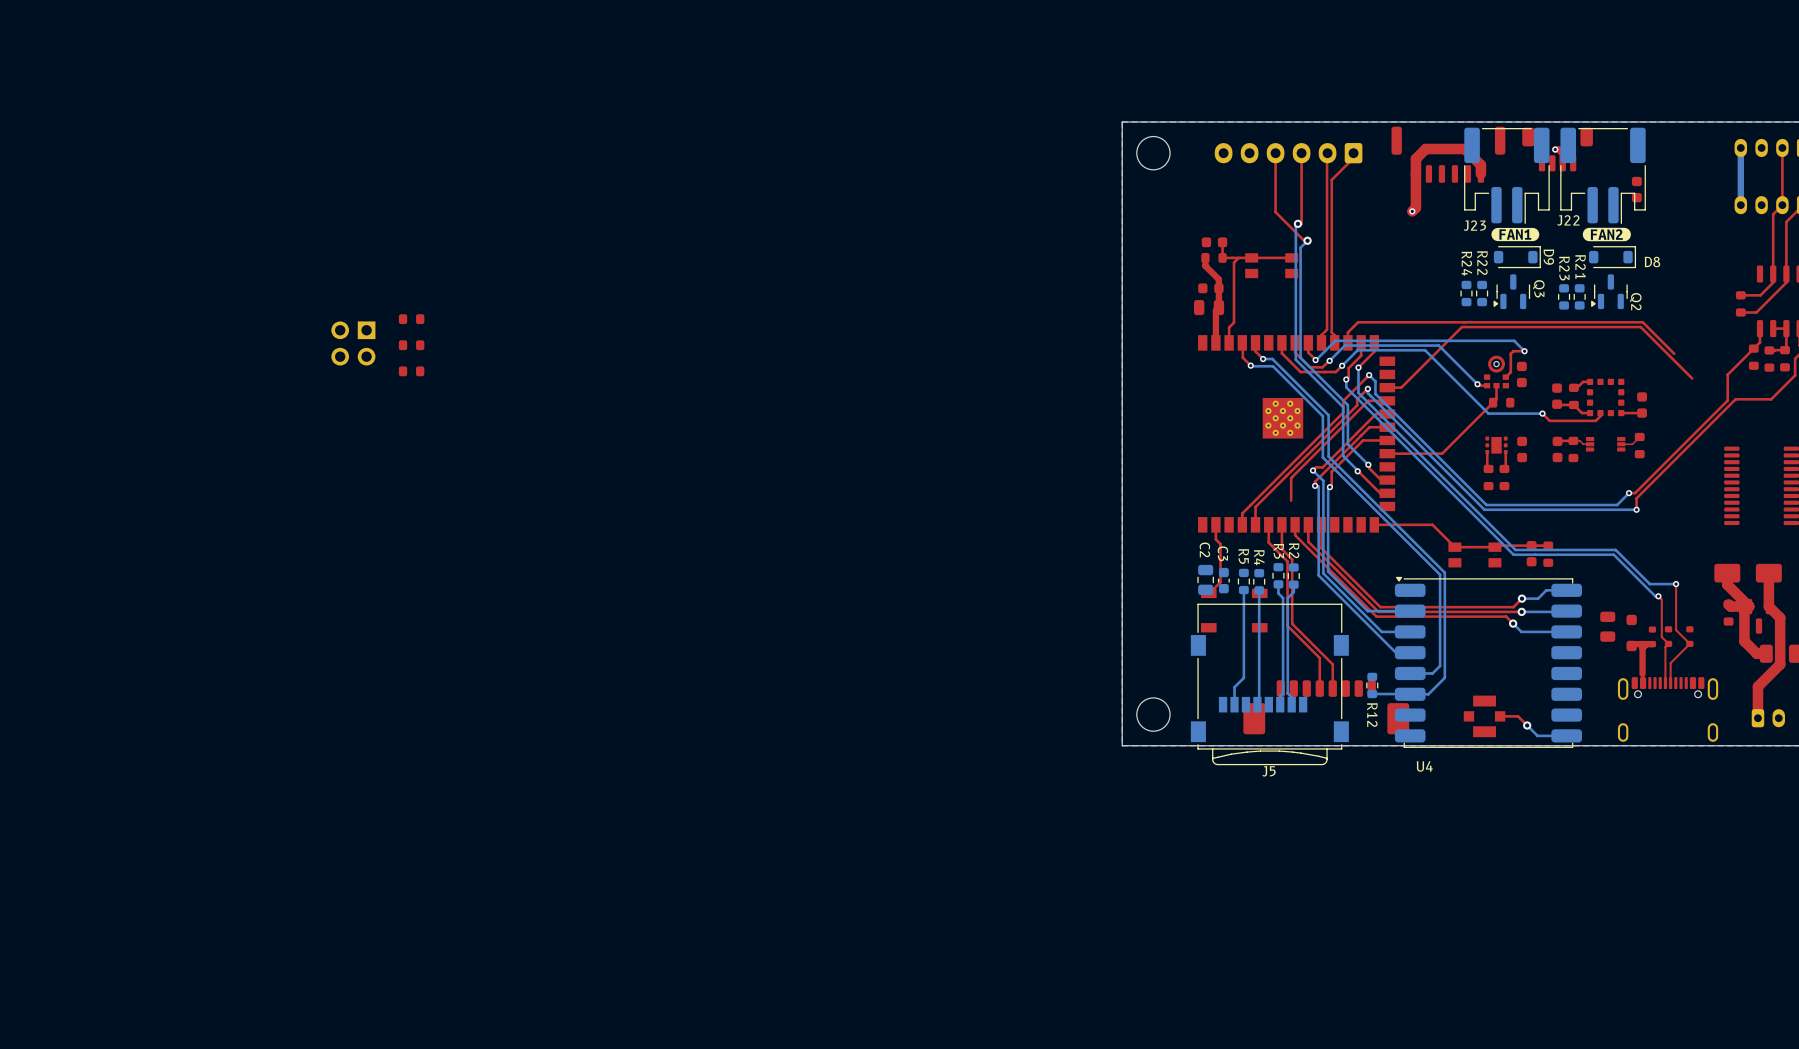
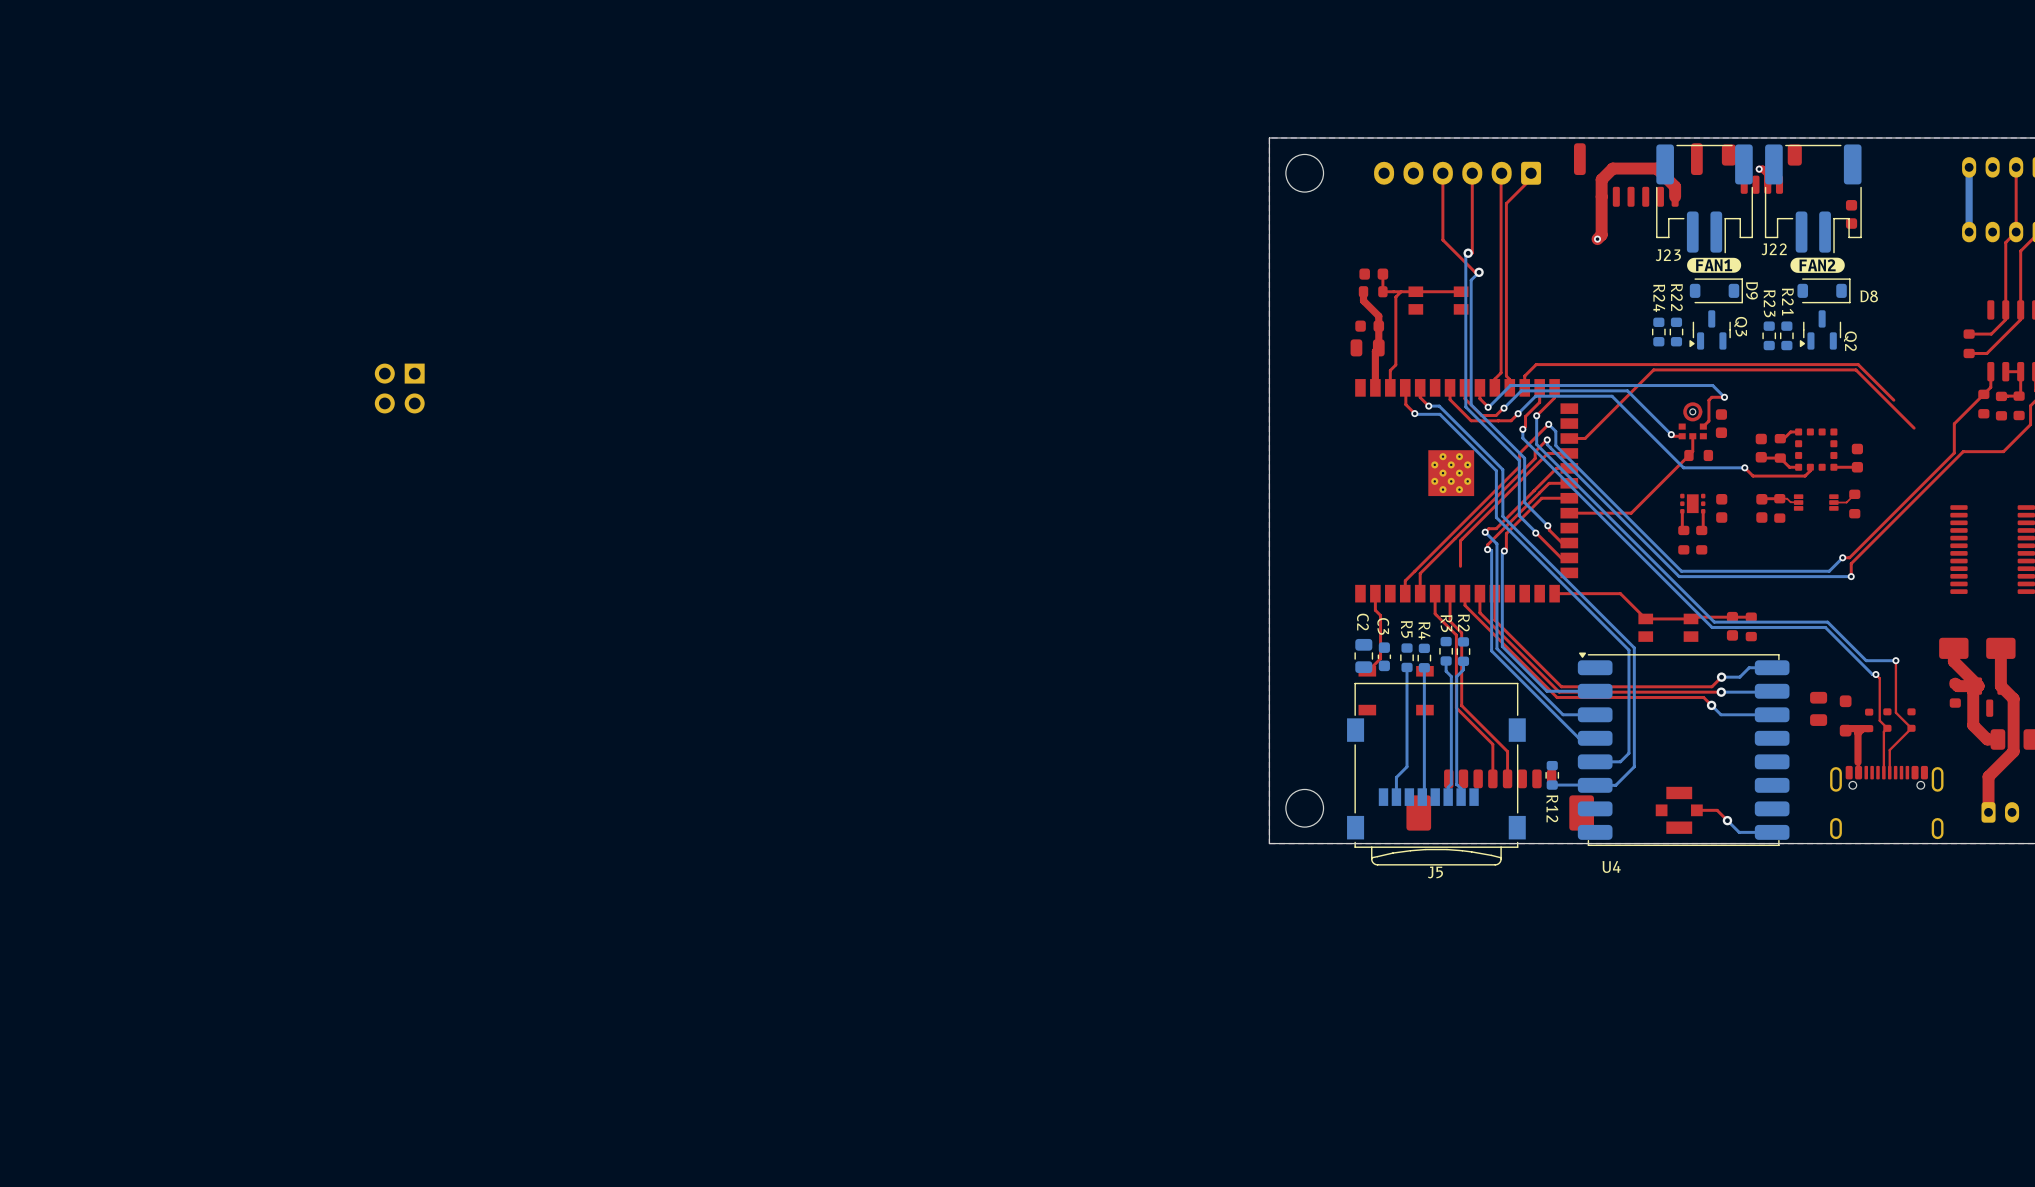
part: (411, 319) -> none
part: (411, 345) -> none
part: (411, 371) -> none

